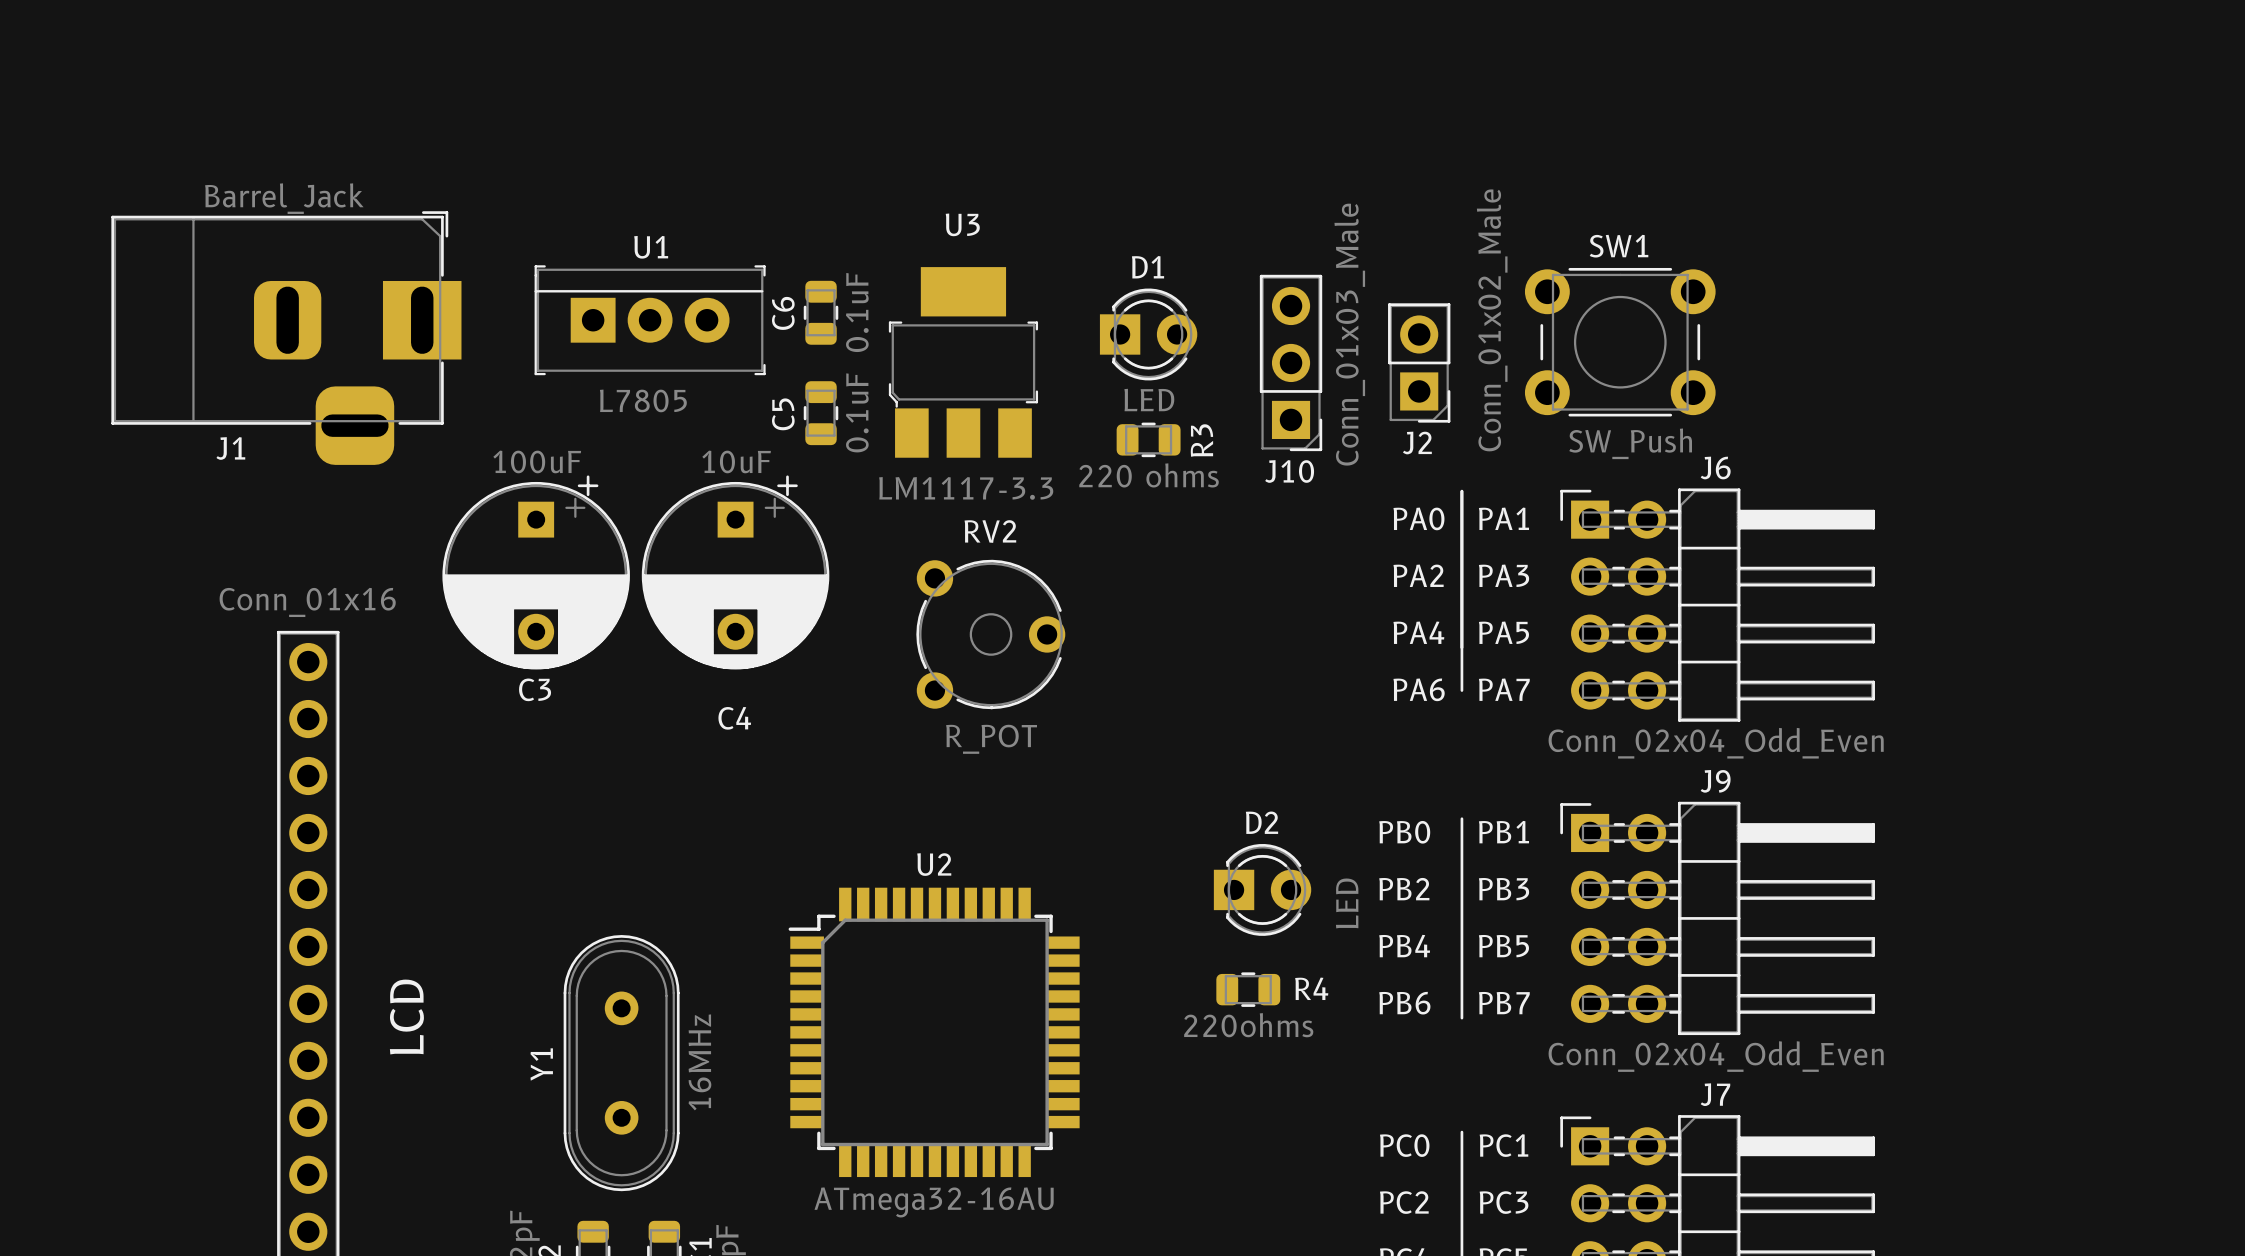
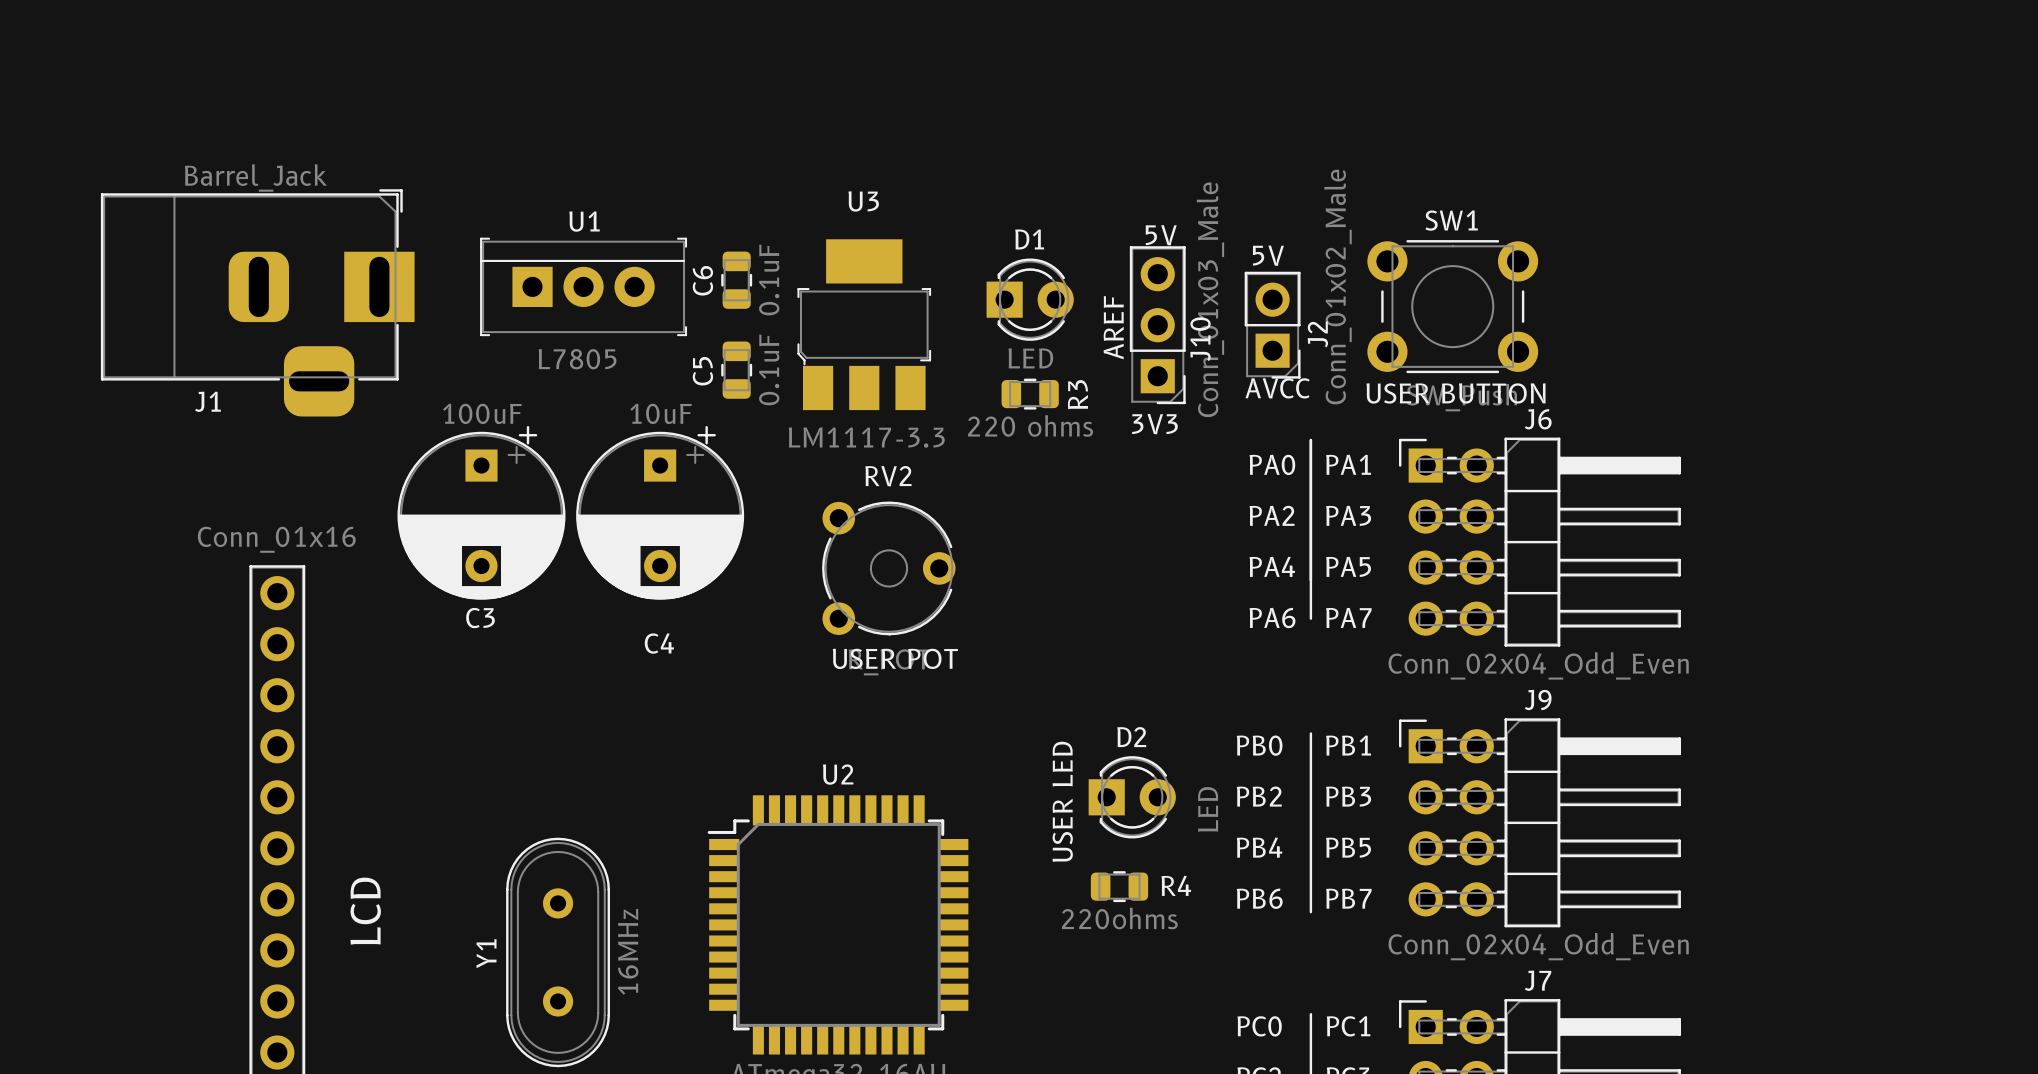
text: none -> 5V (1161, 235)
text: none -> 5V (1268, 255)
text: none -> AREF (1113, 327)
text: none -> AVCC (1277, 388)
text: none -> USER BUTTON (1455, 393)
J2 name rotation: 0° (1417, 443) -> 90° counterclockwise (1317, 334)
J2 name position: J2 (1417, 443) -> J2 (1317, 334)
J10 name rotation: 0° (1289, 471) -> 90° counterclockwise (1200, 339)
J10 name position: J10 (1289, 471) -> J10 (1200, 339)
text: none -> 3V3 (1154, 424)
text: none -> USER POT (895, 658)
text: none -> USER LED (1062, 801)

